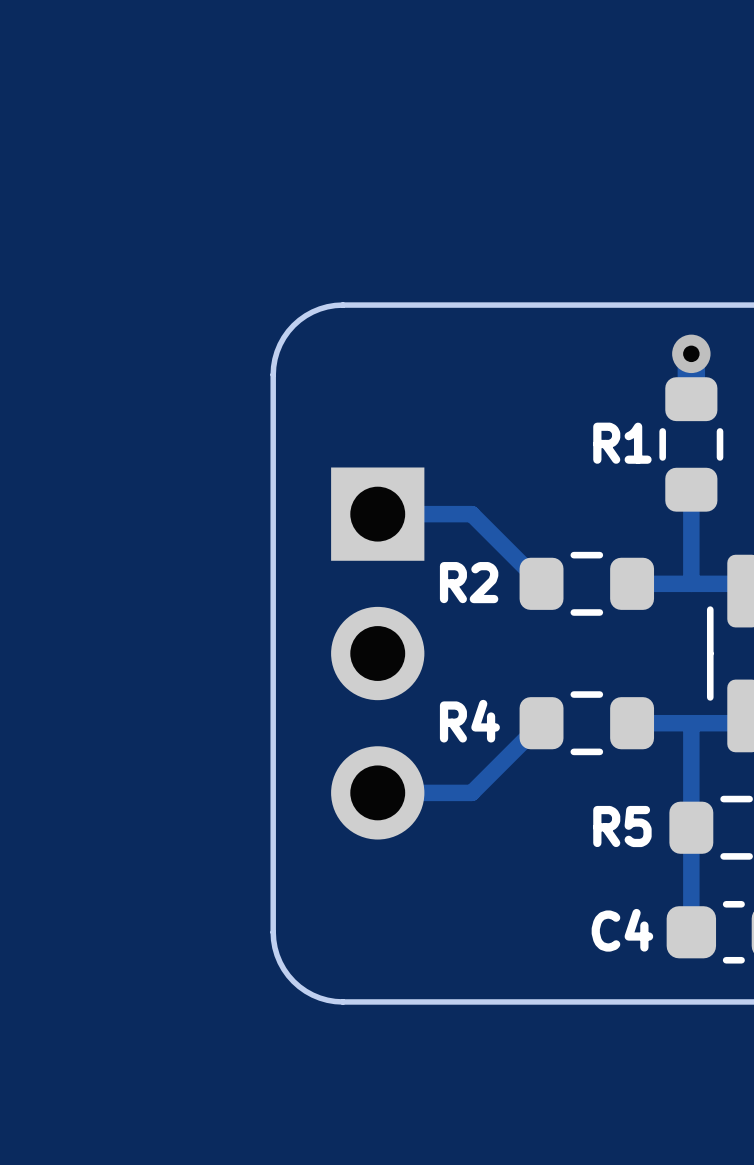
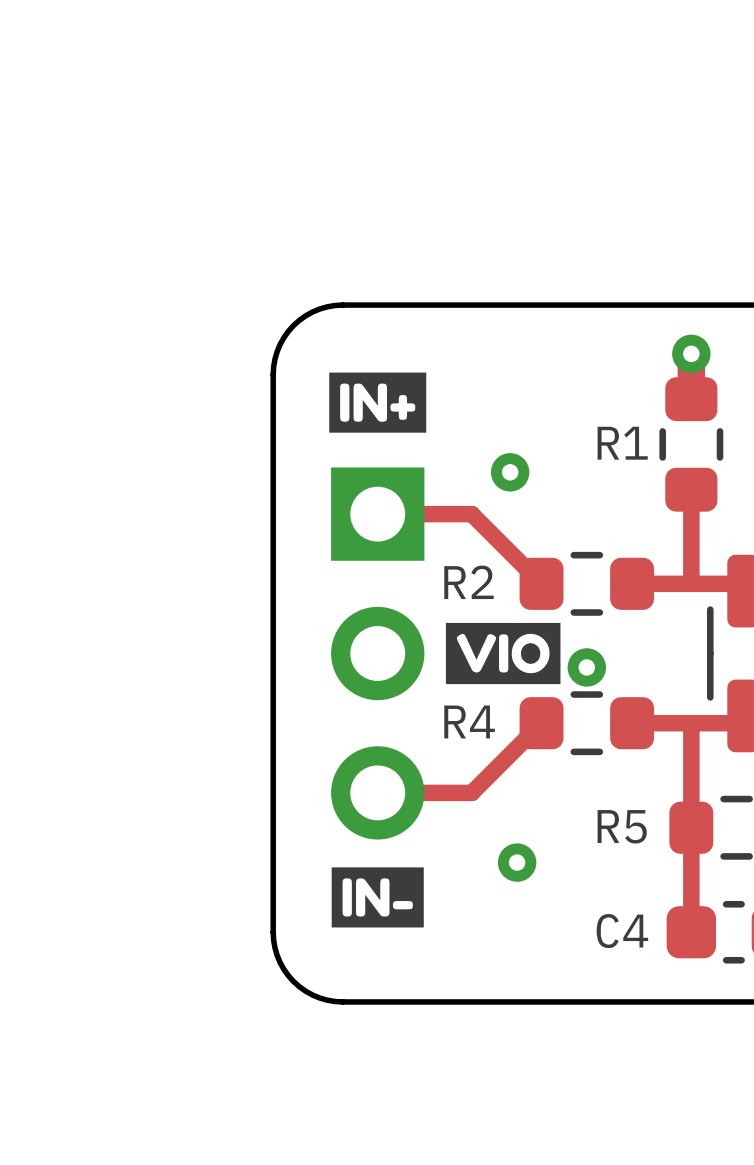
drawing: none -> [329, 372, 427, 433]
via: none -> (510, 472)
drawing: none -> [445, 622, 561, 685]
via: none -> (586, 667)
via: none -> (517, 862)
drawing: none -> [331, 867, 424, 928]

